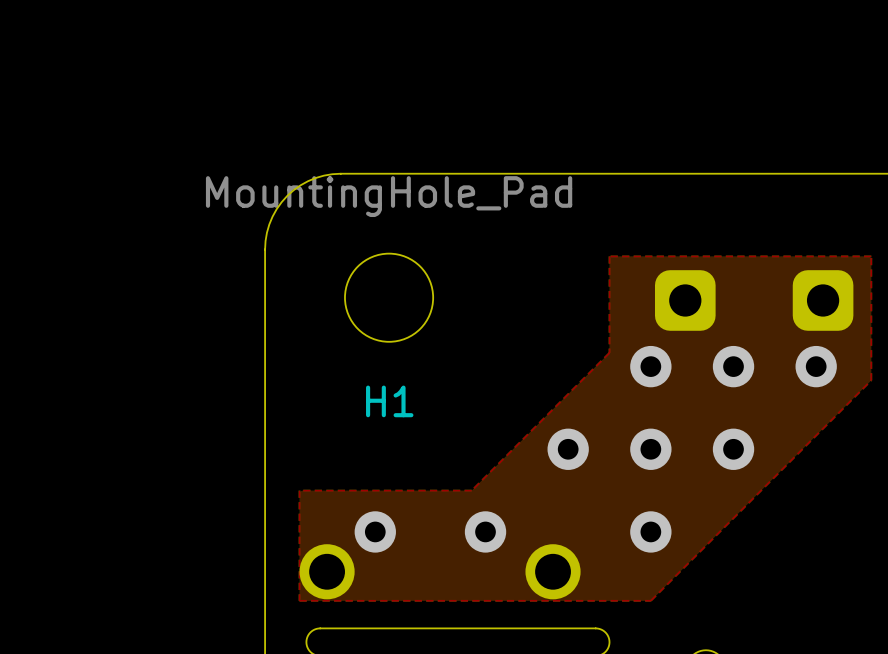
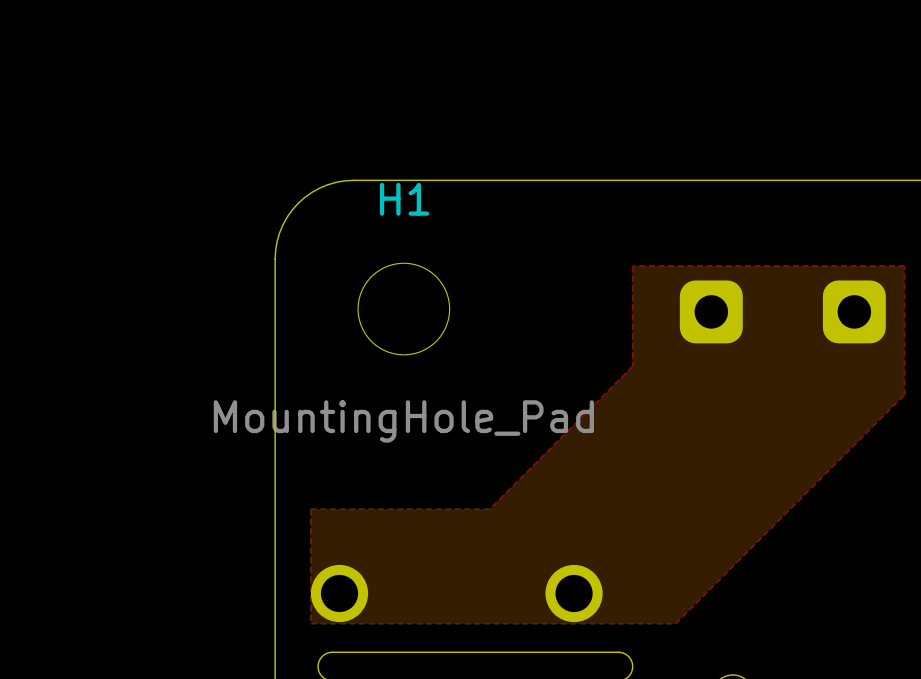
H1 value position: MountingHole_Pad (389, 196) -> MountingHole_Pad (403, 421)
via: (650, 366) -> none
via: (733, 366) -> none
via: (816, 366) -> none
H1 name position: H1 (389, 401) -> H1 (404, 199)
via: (568, 449) -> none
via: (650, 449) -> none
via: (733, 449) -> none
via: (375, 531) -> none
via: (485, 531) -> none
via: (650, 531) -> none

